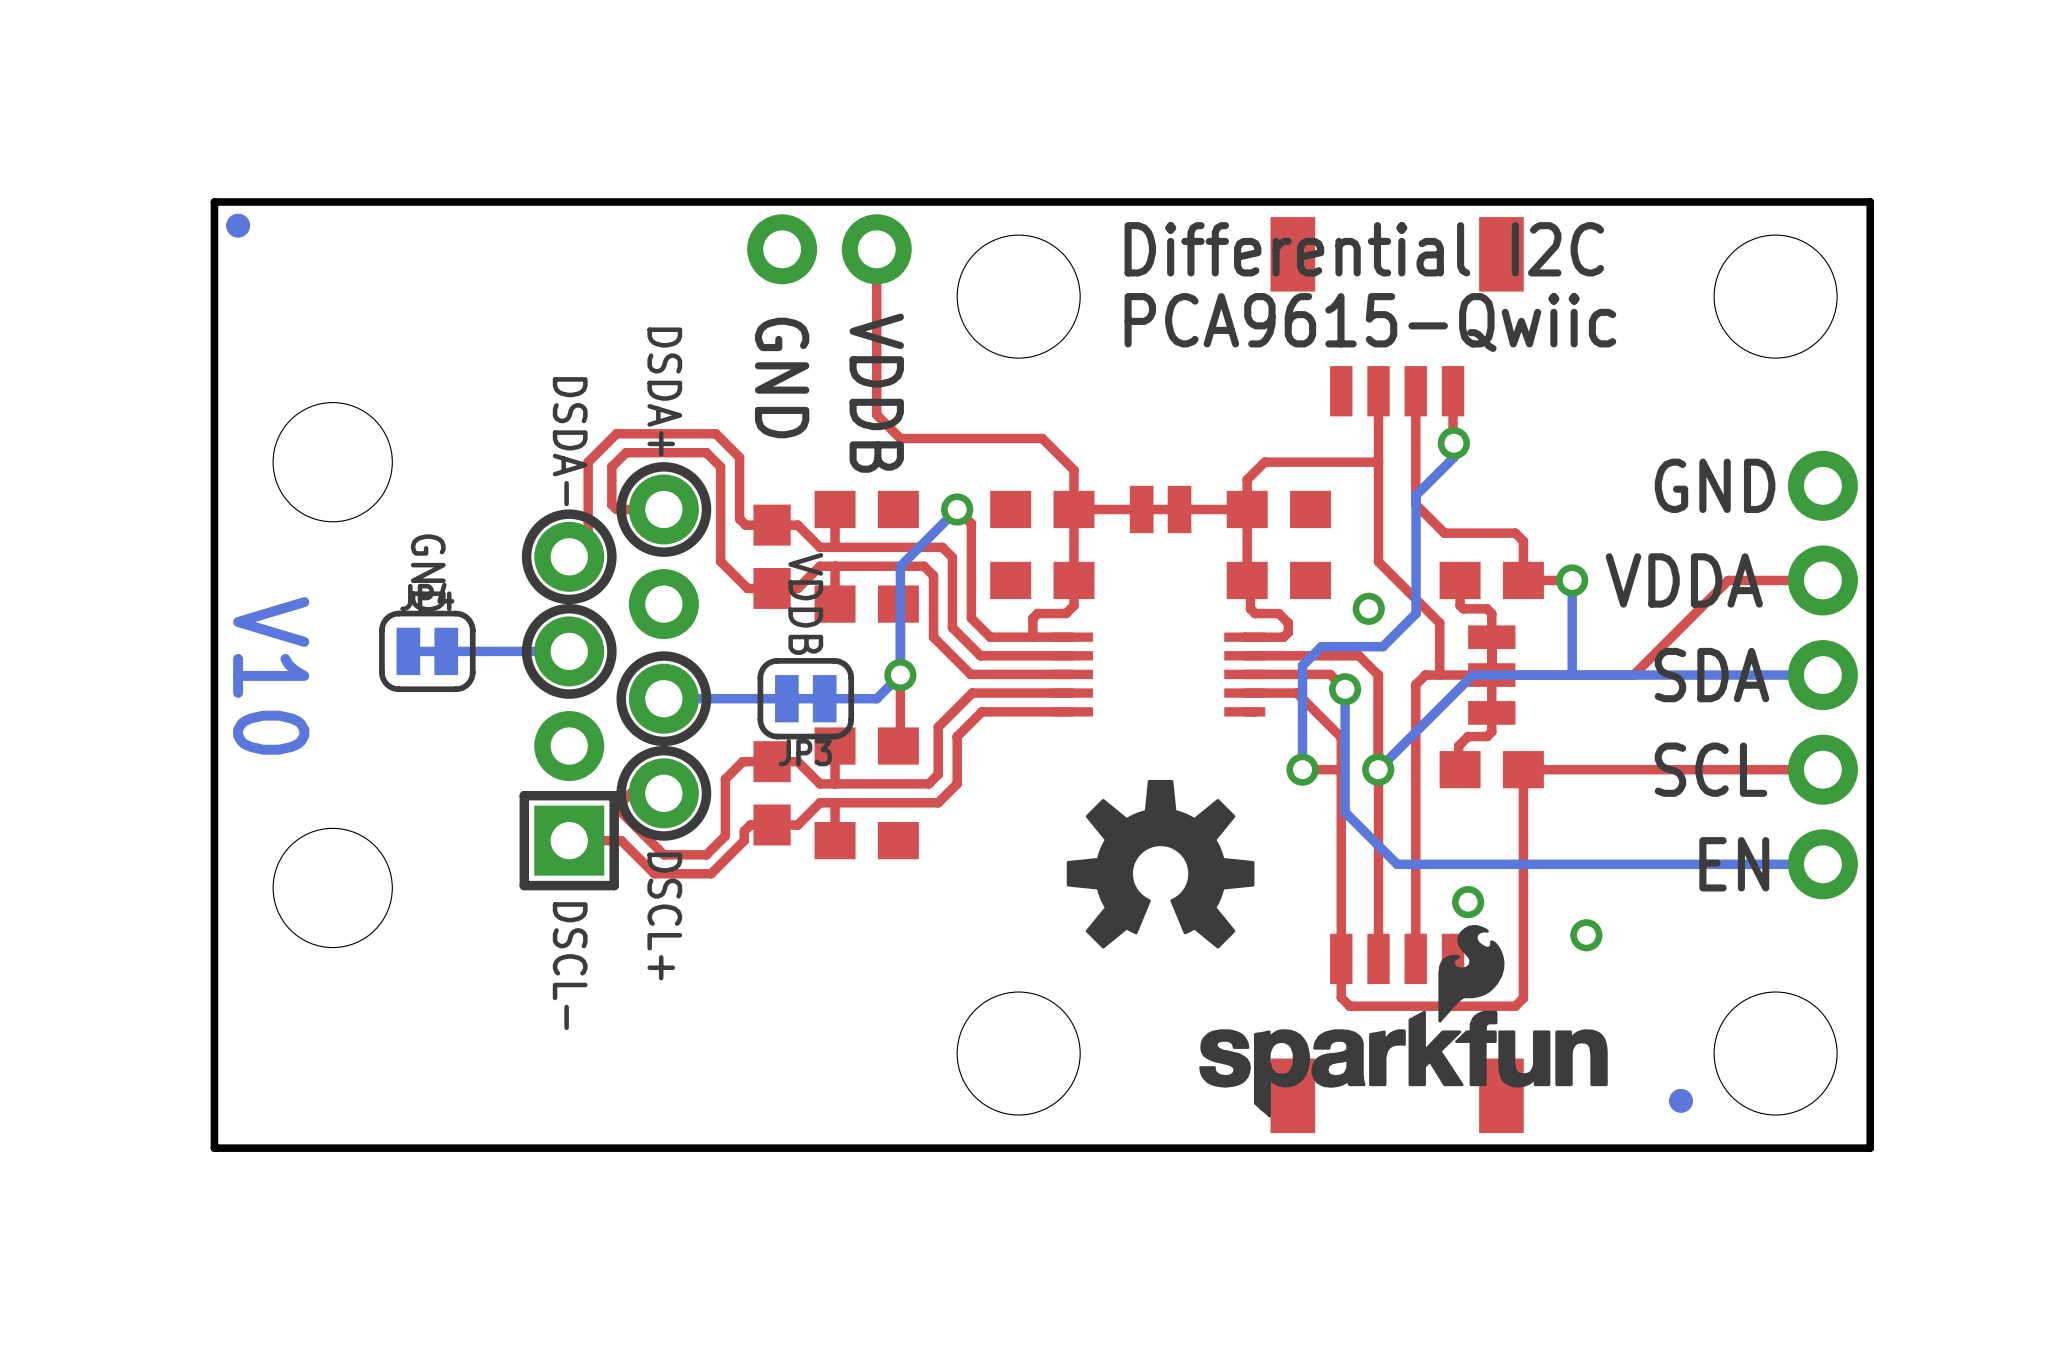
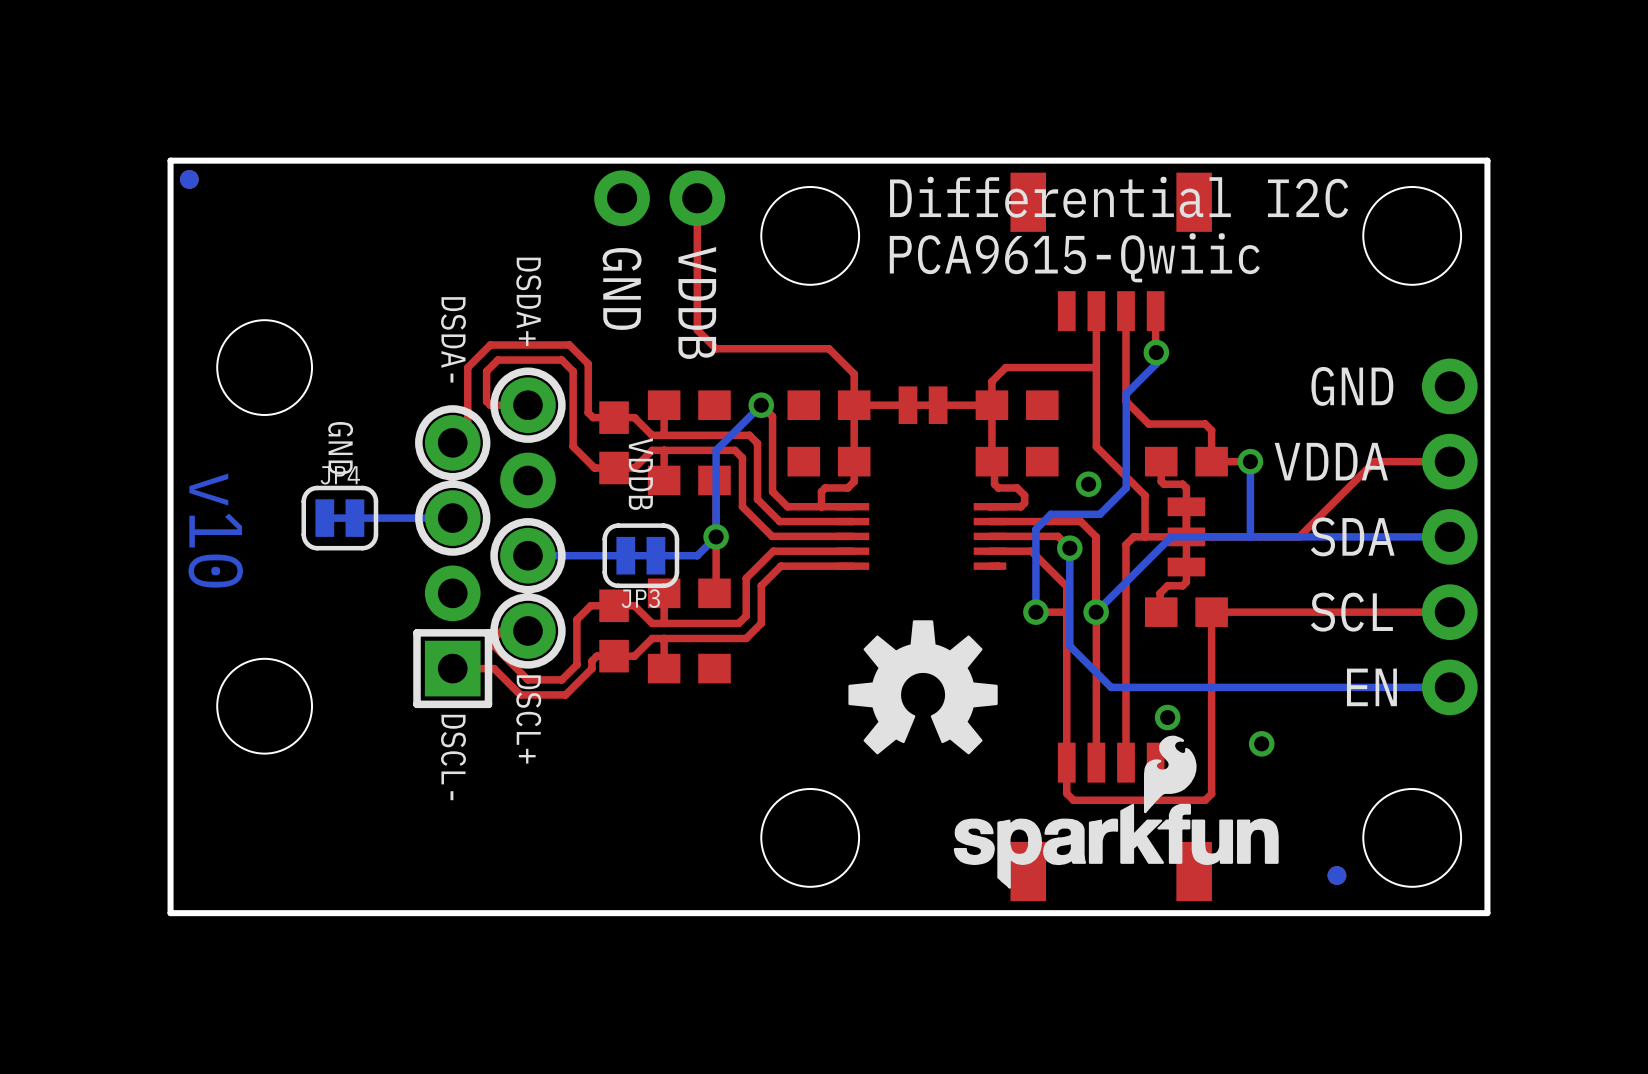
text: V10 (271, 675) -> v10 (215, 530)

